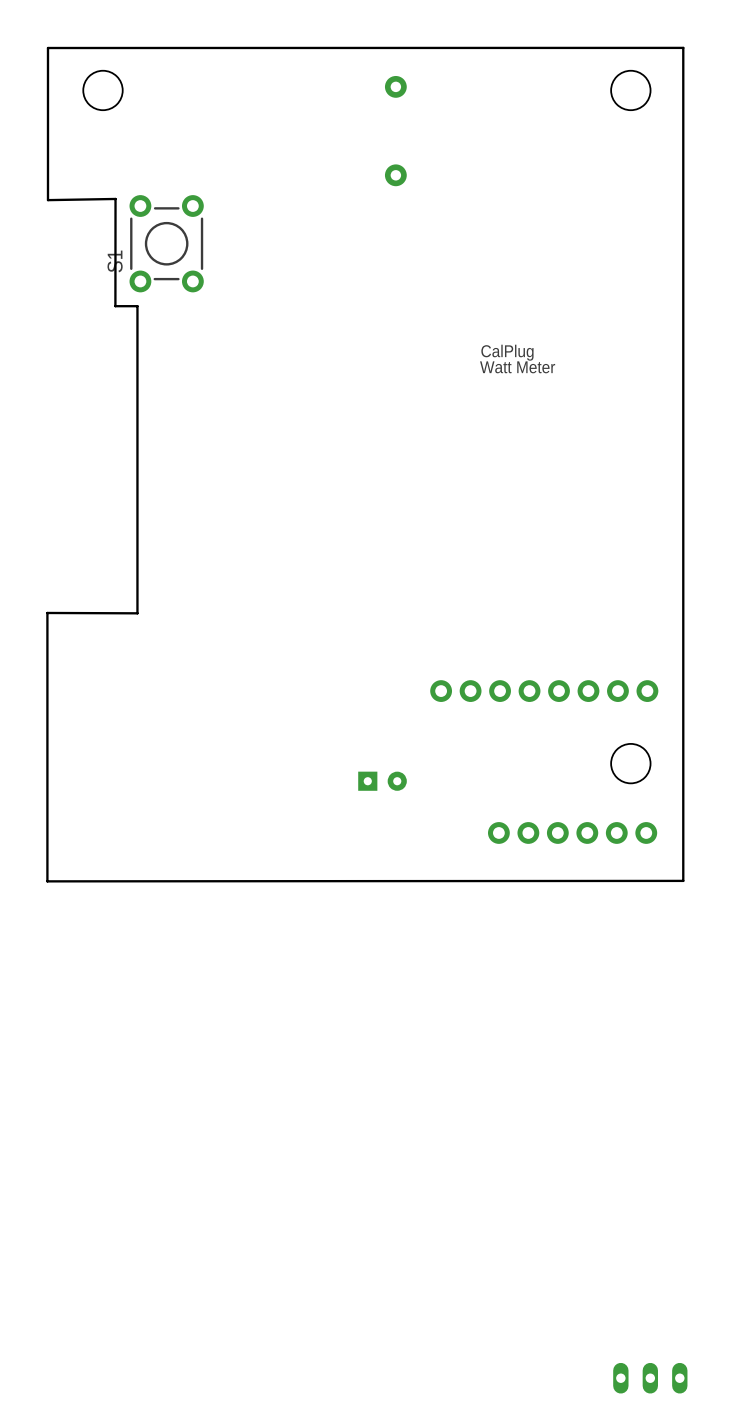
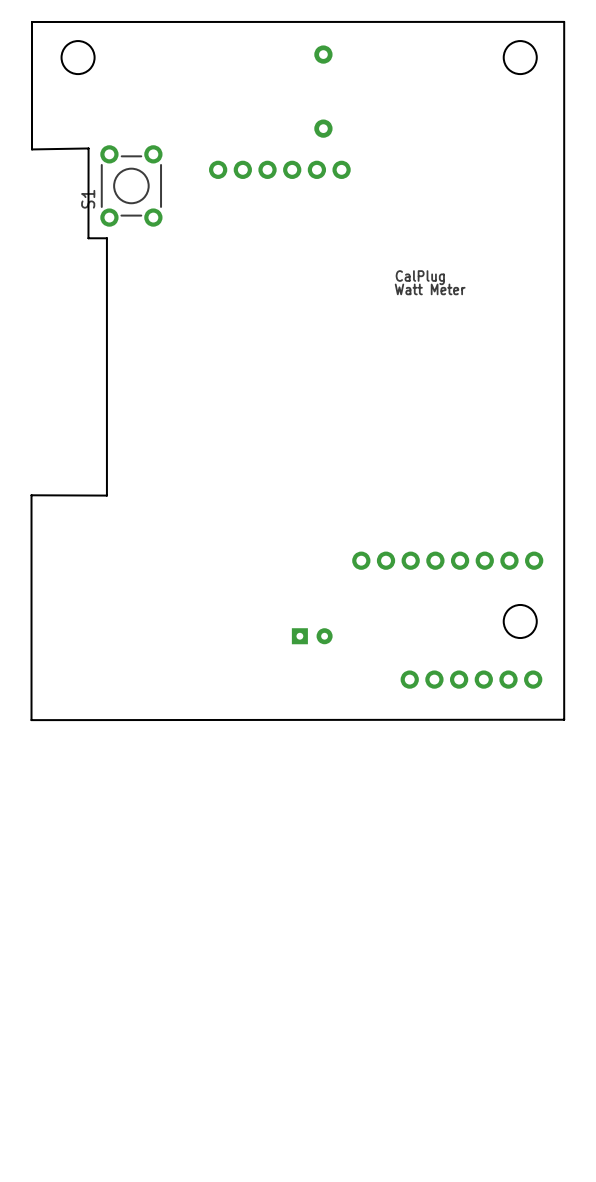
part: none -> (279, 169)
part: (650, 1378) -> none

